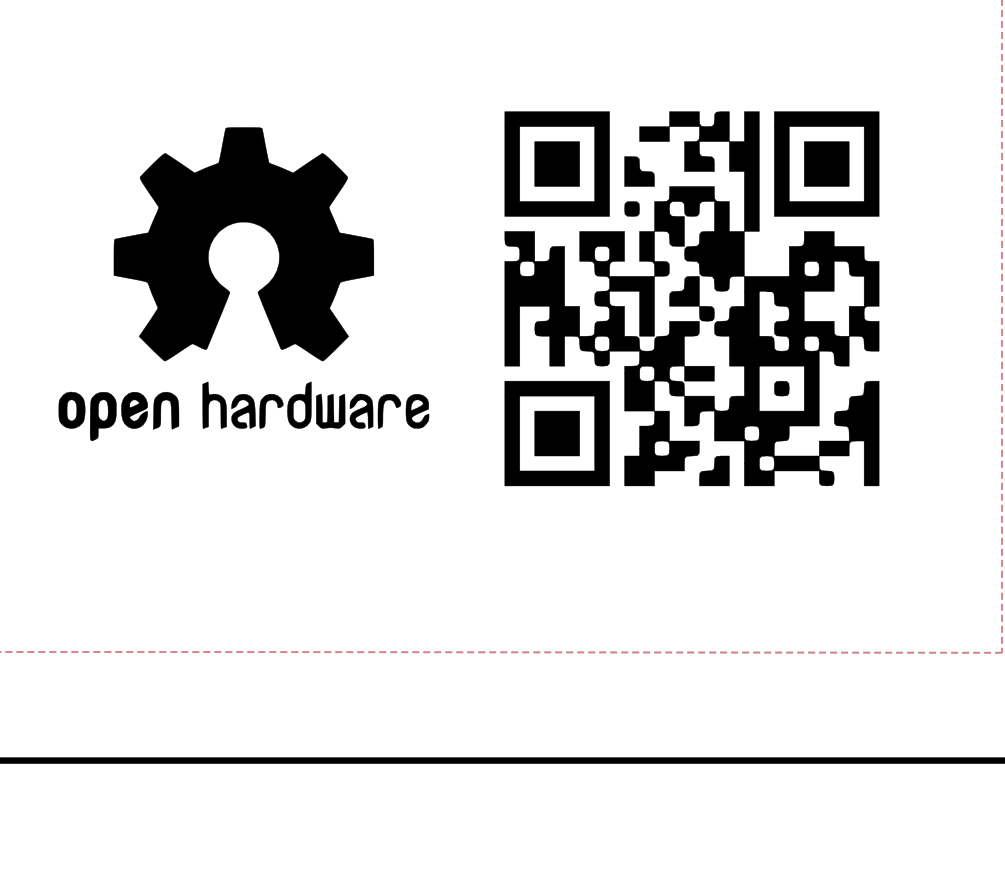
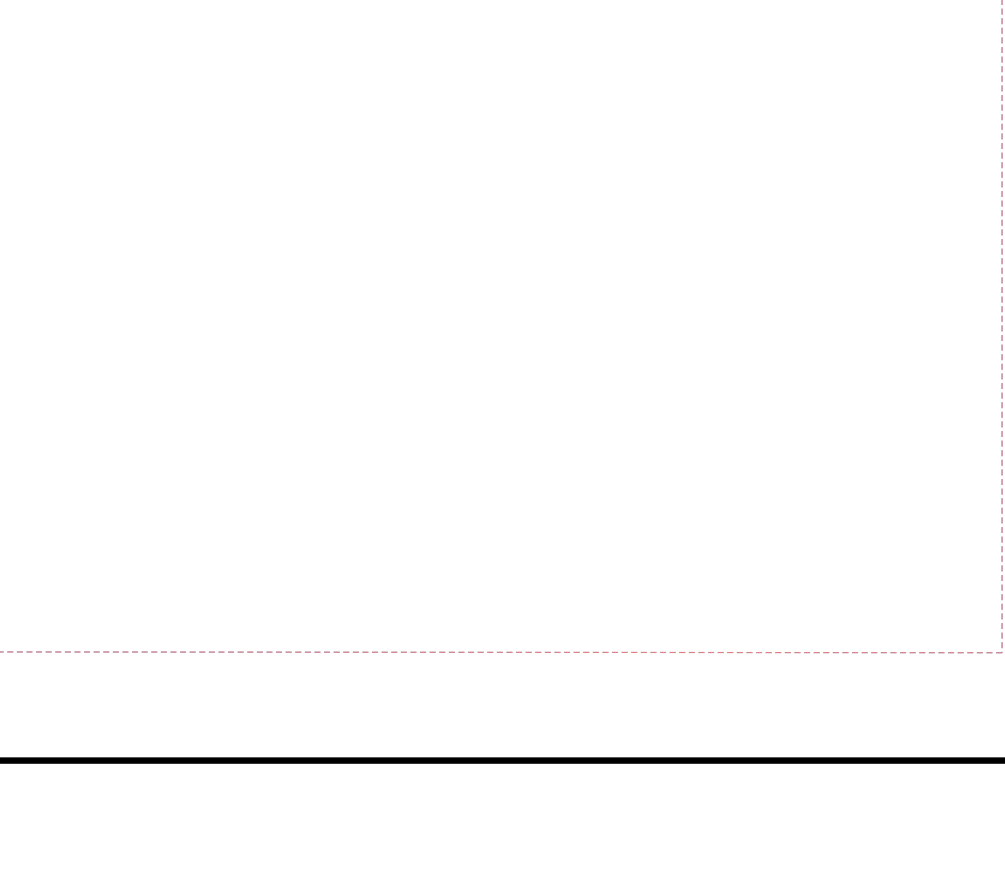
drawing: [504, 111, 880, 487] -> none
drawing: [58, 127, 430, 442] -> none

